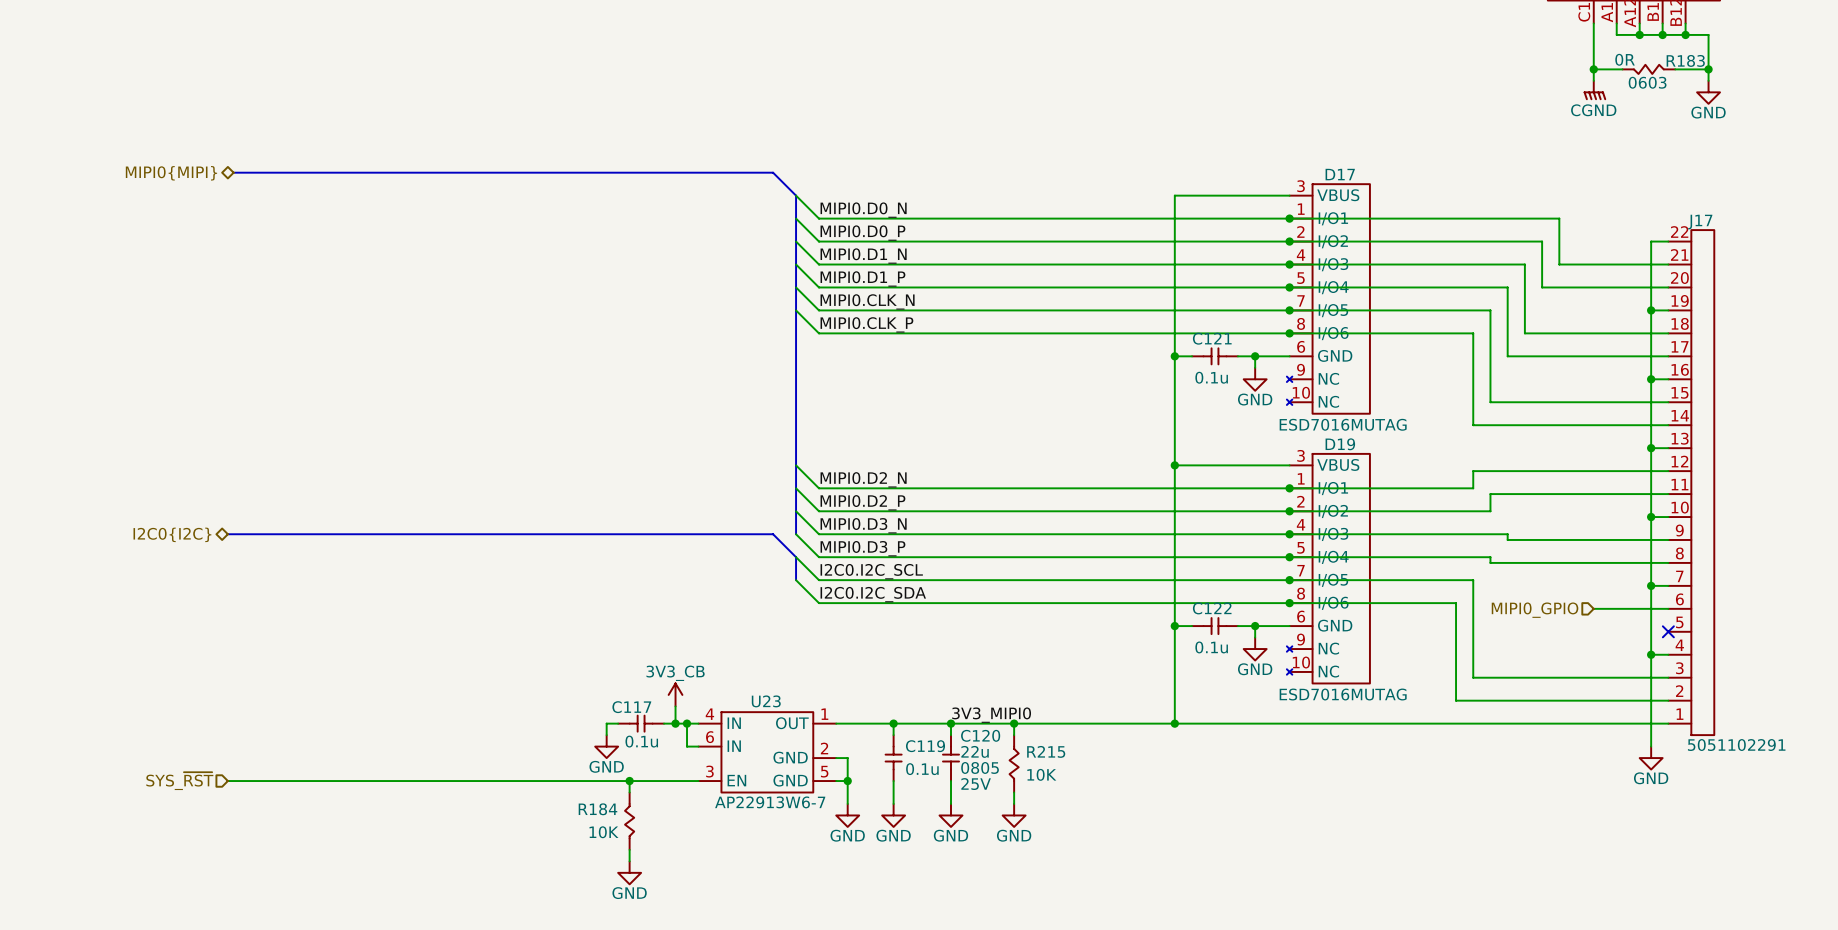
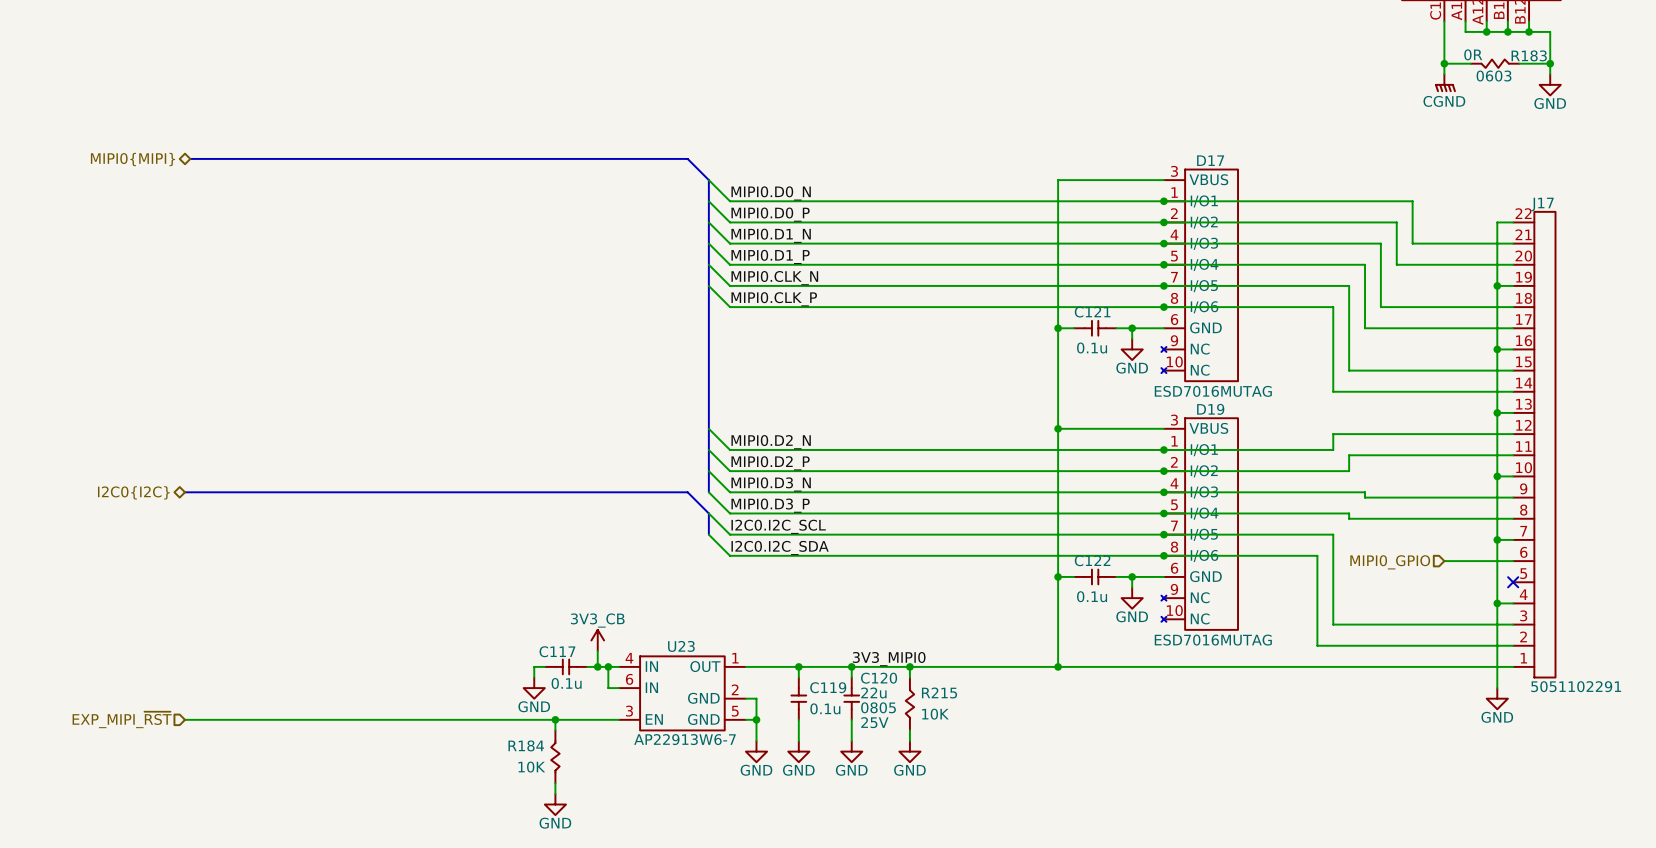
hierarchical label: SYS_~{RST} (179, 781) -> EXP_MIPI_~{RST} (122, 719)

